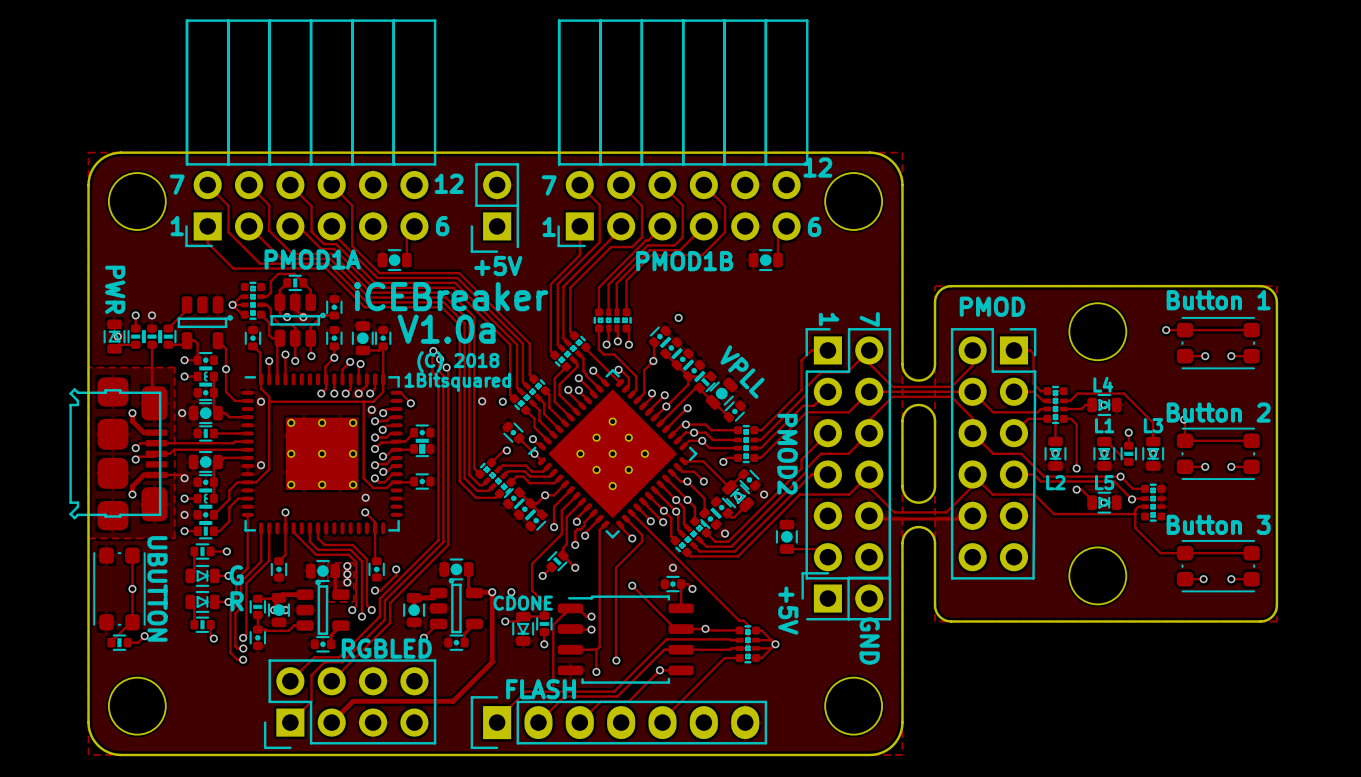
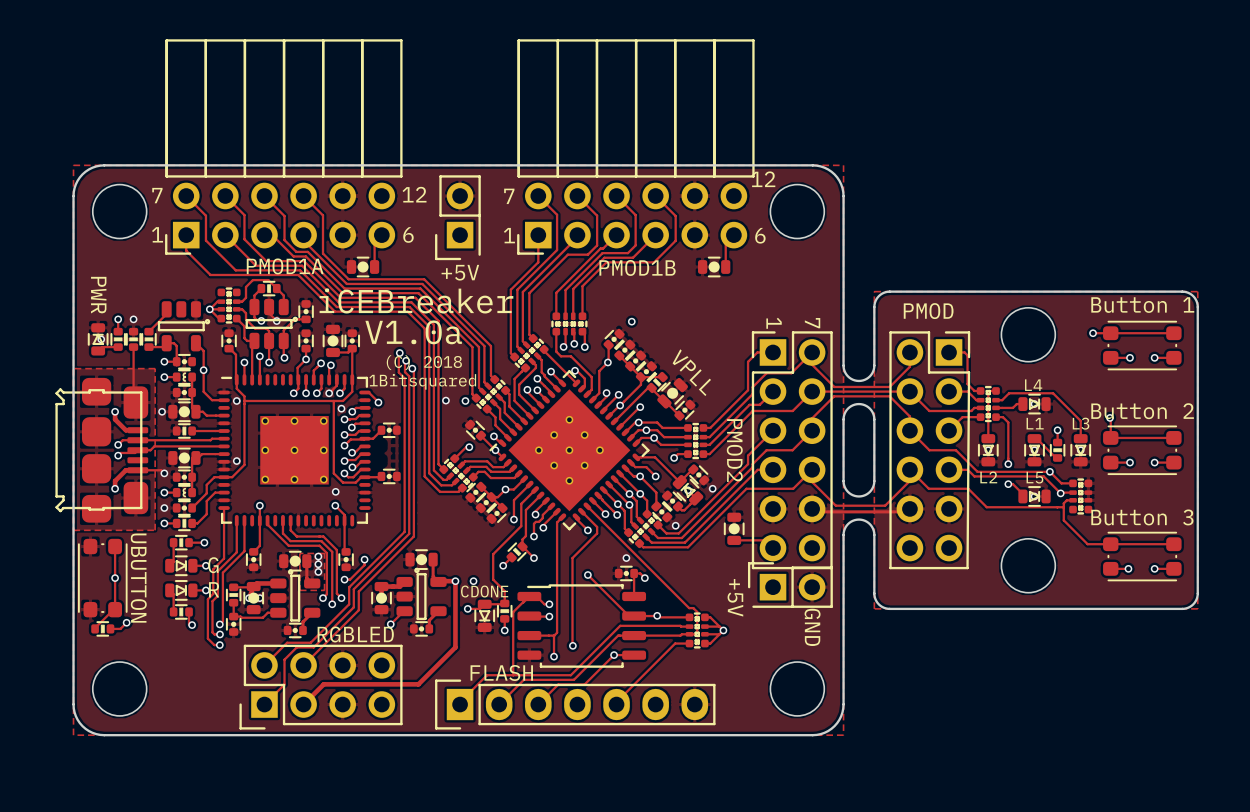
track: (414, 448) (396, 449) -> none
part: (422, 448) -> none

